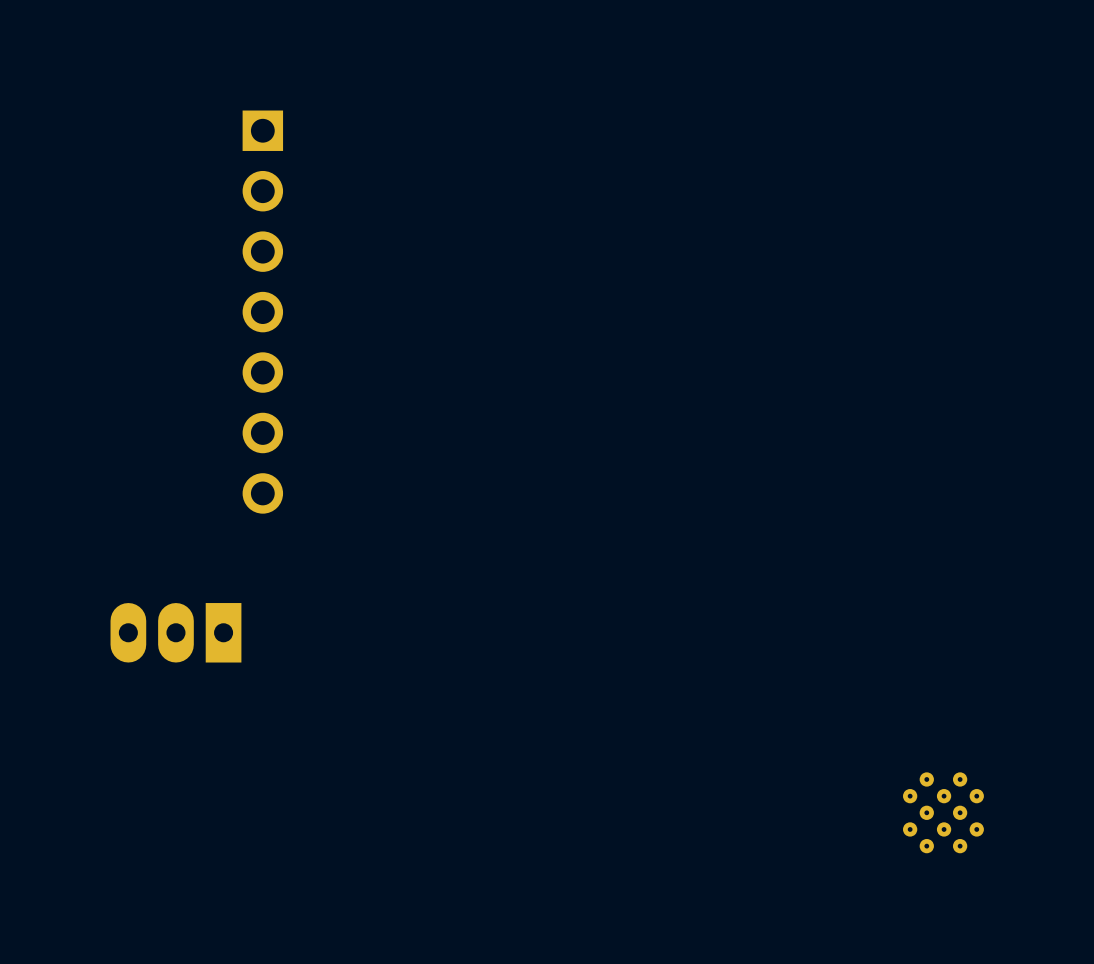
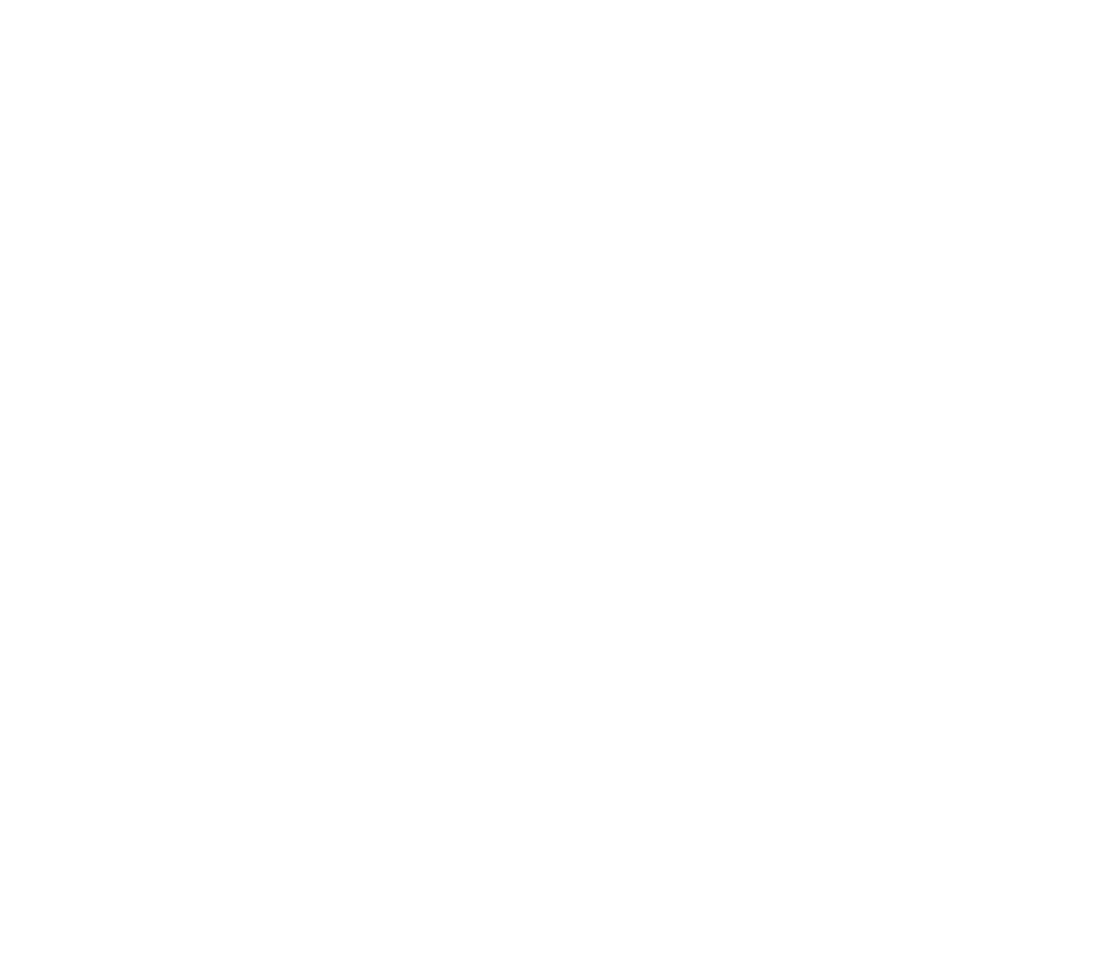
part: (262, 312) -> none
part: (175, 632) -> none
part: (943, 812) -> none

